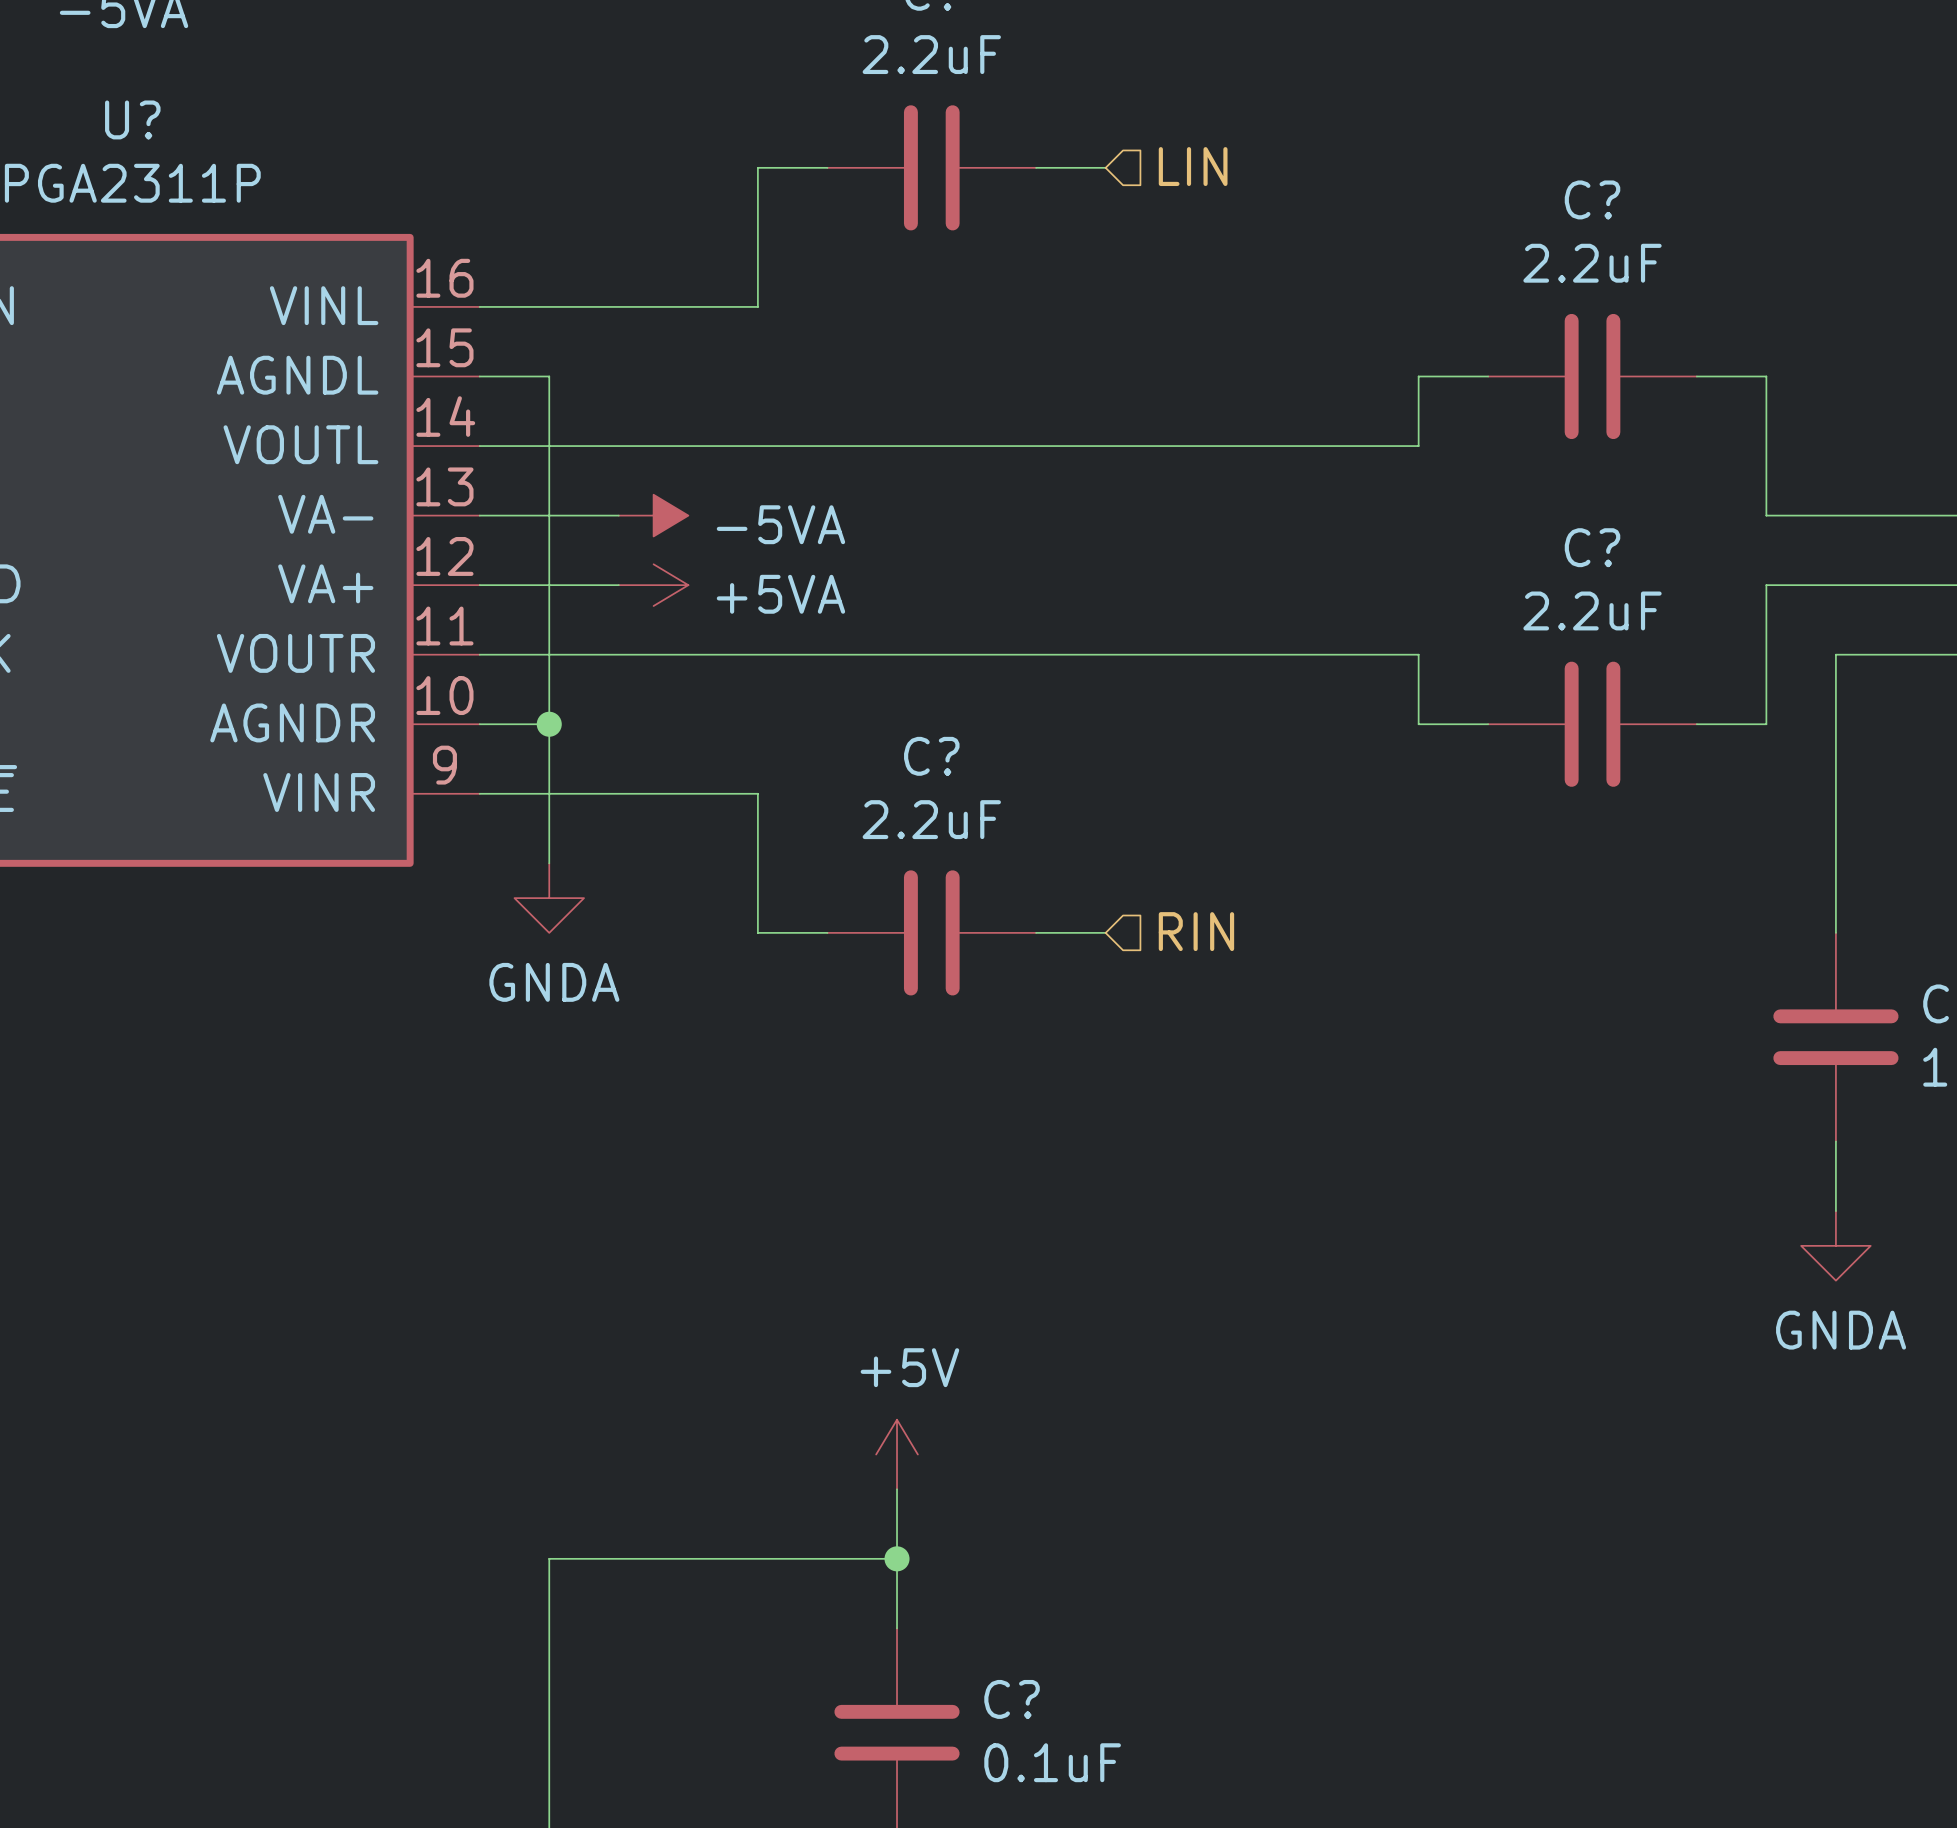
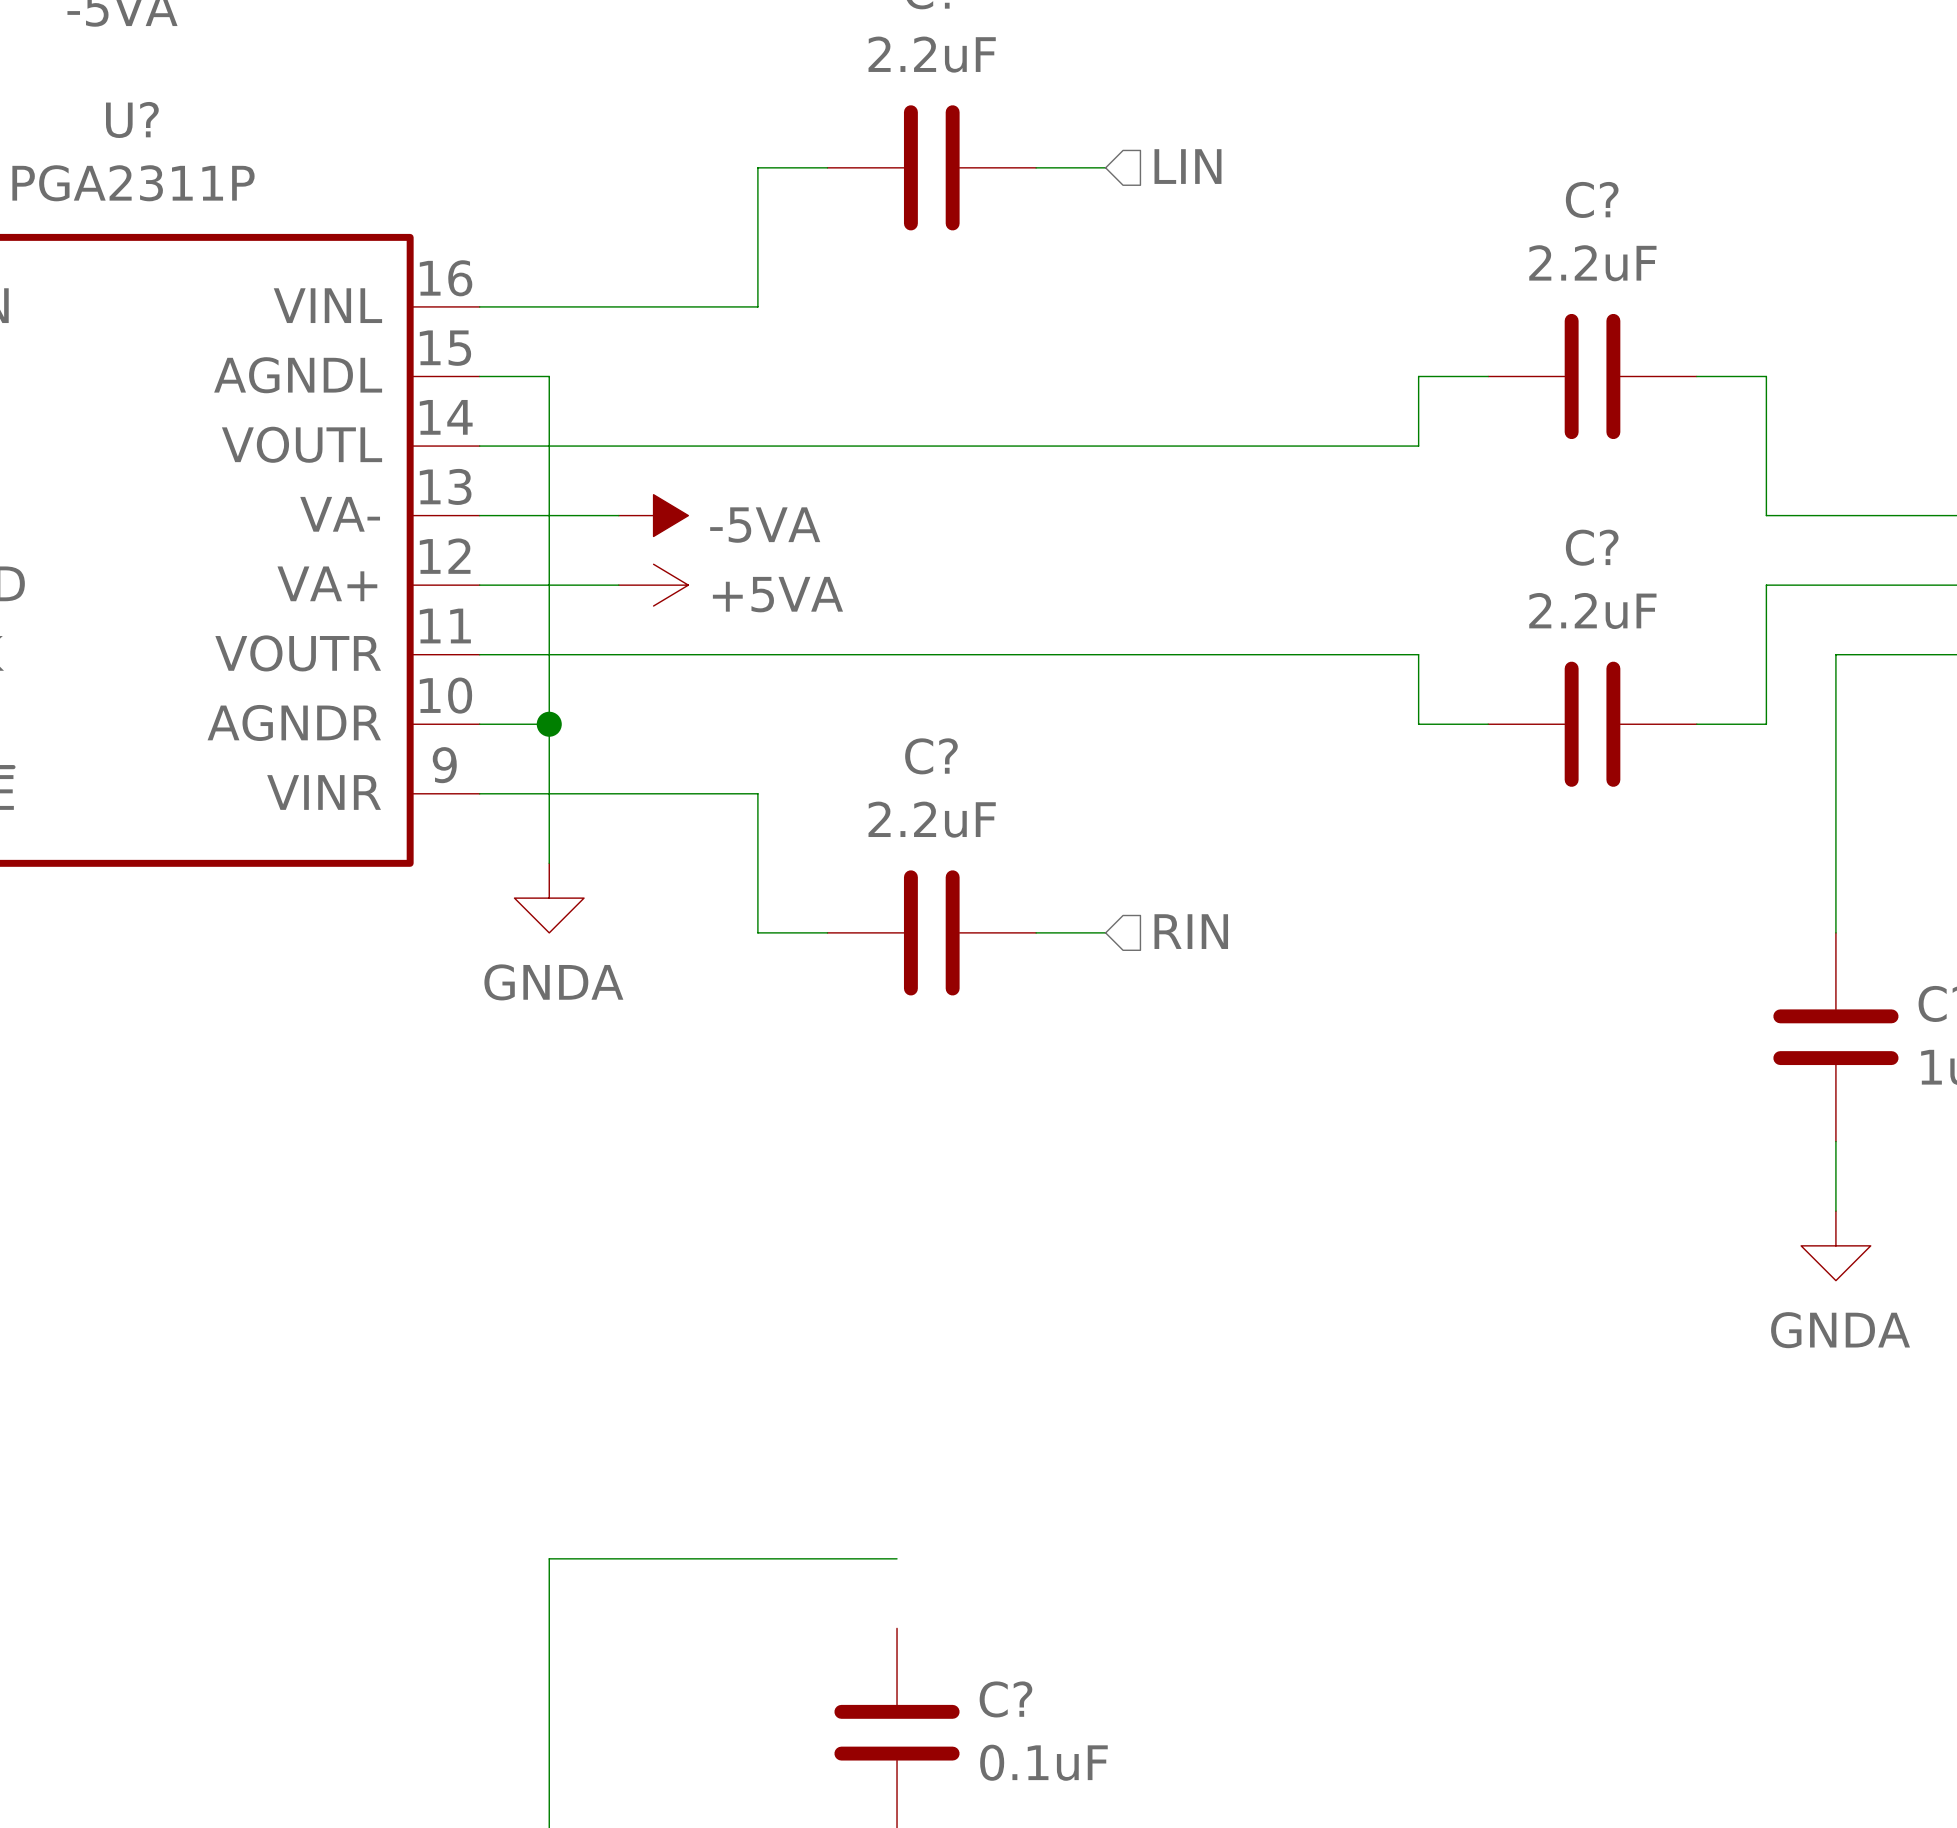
power symbol: +5V (897, 1454) -> none
wire: (897, 1489) (897, 1628) -> none
junction: (897, 1558) -> none

